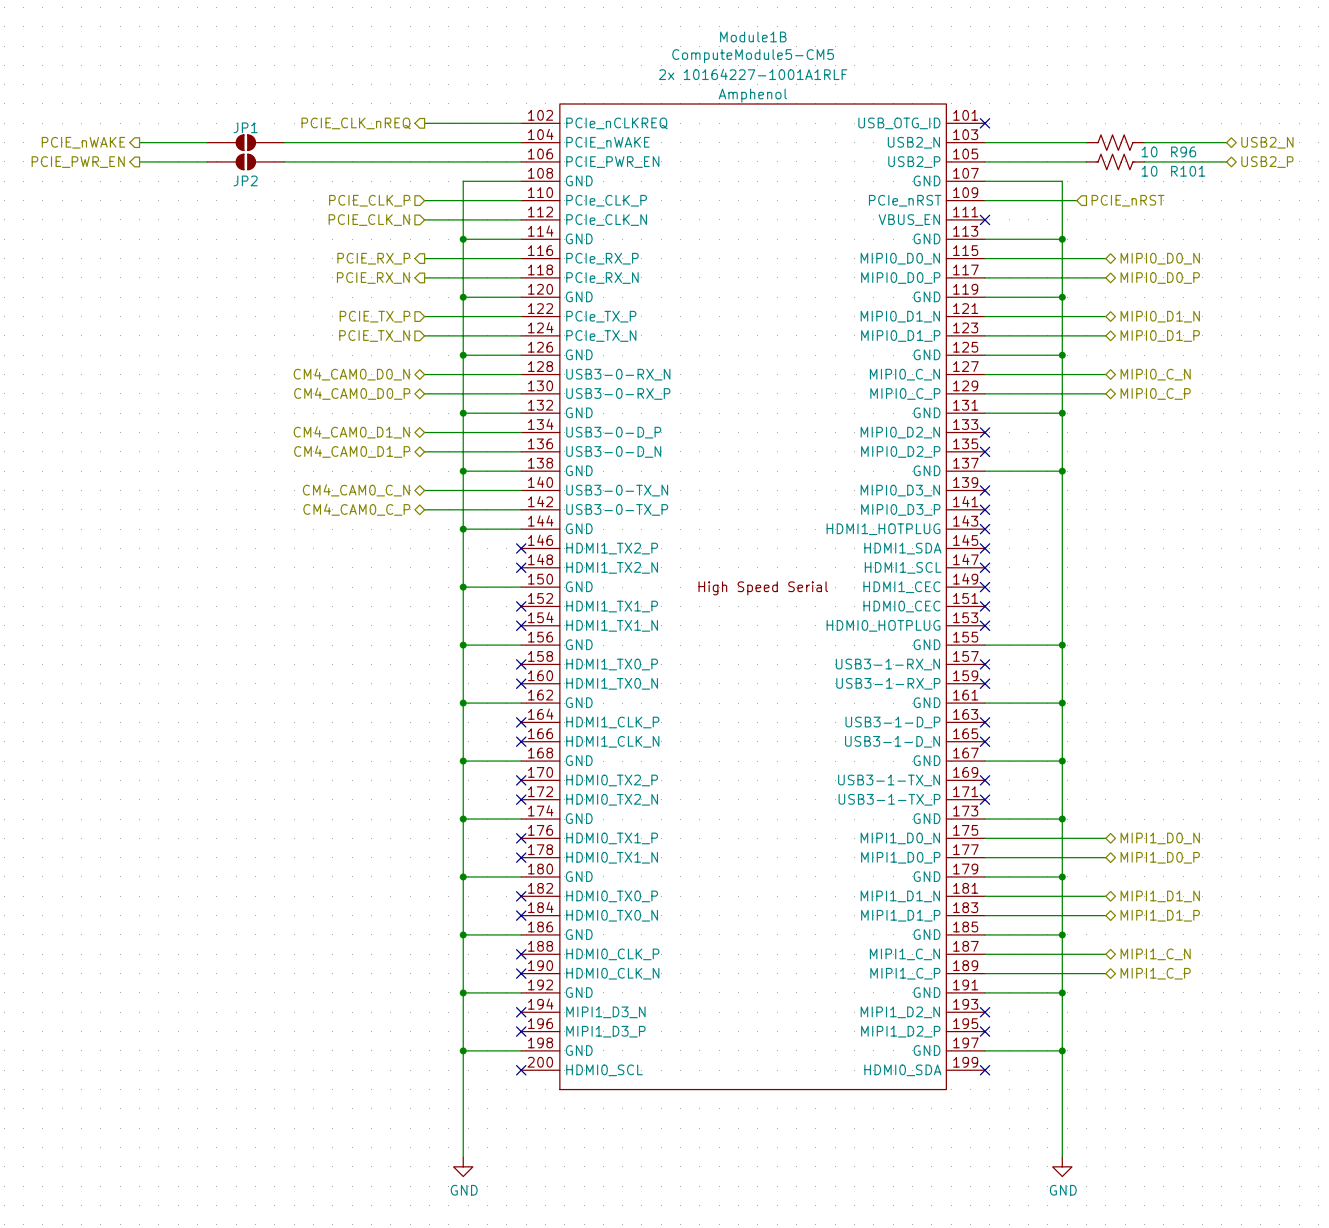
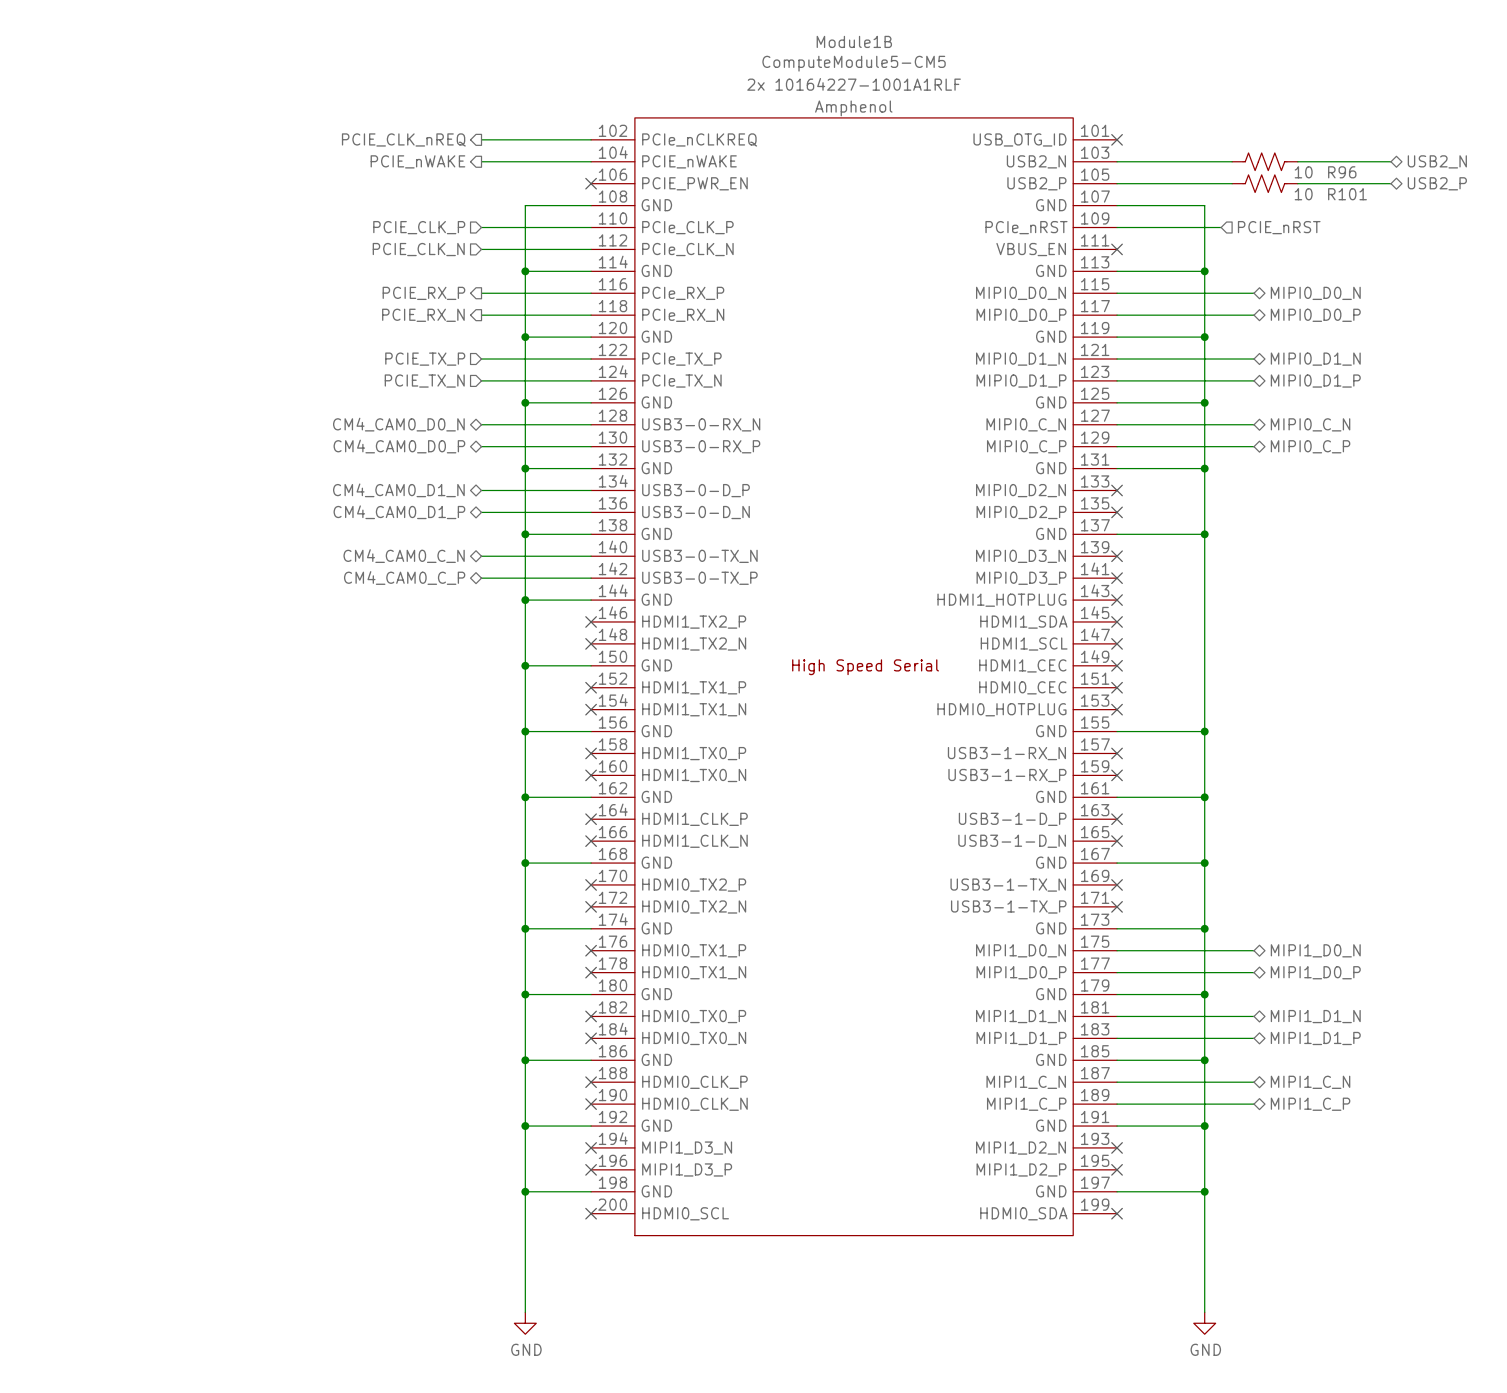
hierarchical label: PCIE_nWAKE (83, 142) -> none
wire: (139, 142) (207, 142) -> none
JP1: (245, 142) -> none
wire: (284, 142) (424, 142) -> none
hierarchical label: none -> PCIE_nWAKE (417, 161)
wire: (139, 161) (207, 161) -> none
JP2: (245, 161) -> none
wire: (284, 161) (521, 161) -> none
no-connect mark: none -> (591, 183)
hierarchical label: PCIE_PWR_EN (78, 162) -> none

